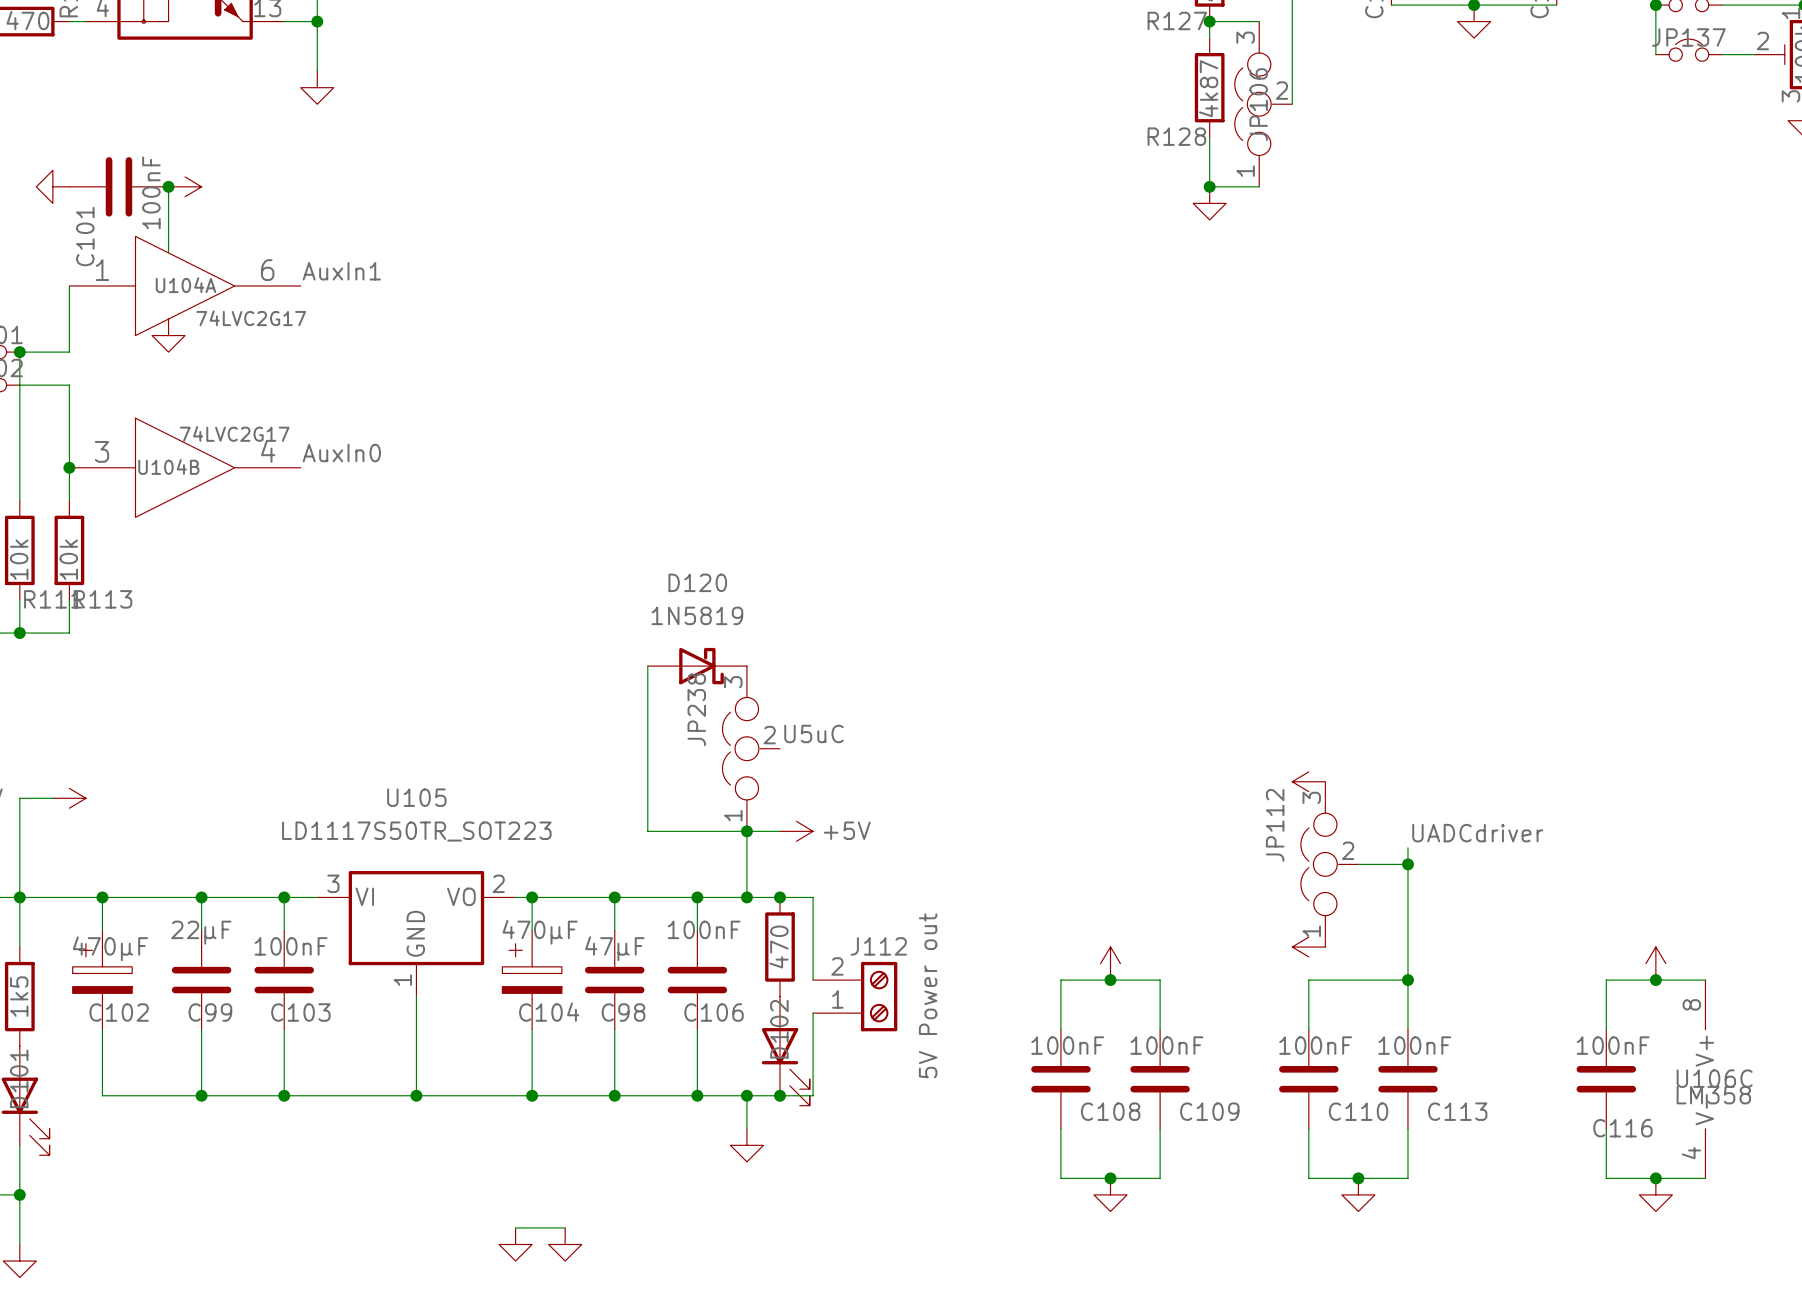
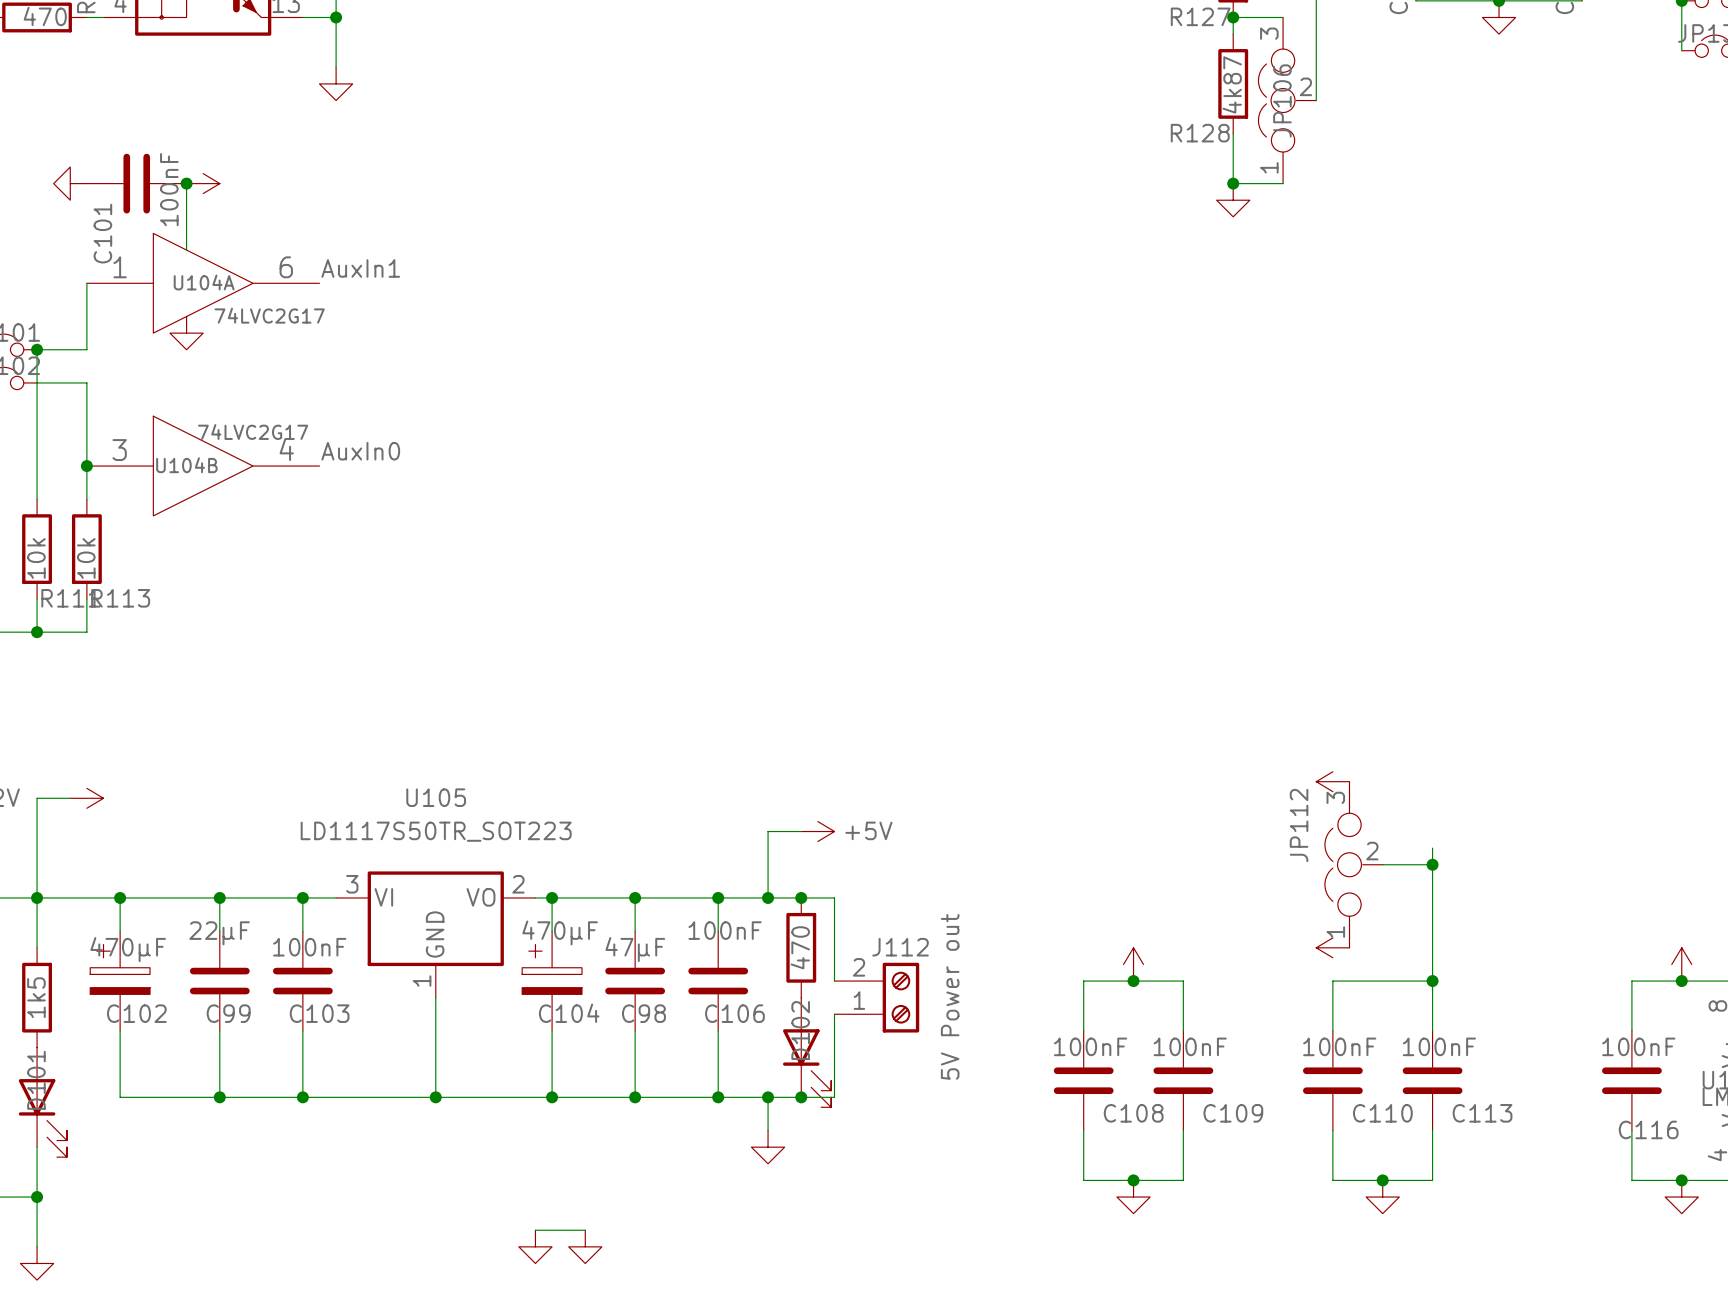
wire: (647, 666) (647, 831) (746, 831) -> none
D120: 1N5819 (697, 666) -> none
label: U5uC (813, 733) -> none
JP238: (751, 748) -> none
junction: (746, 831) -> none
label: UADCdriver (1477, 833) -> none

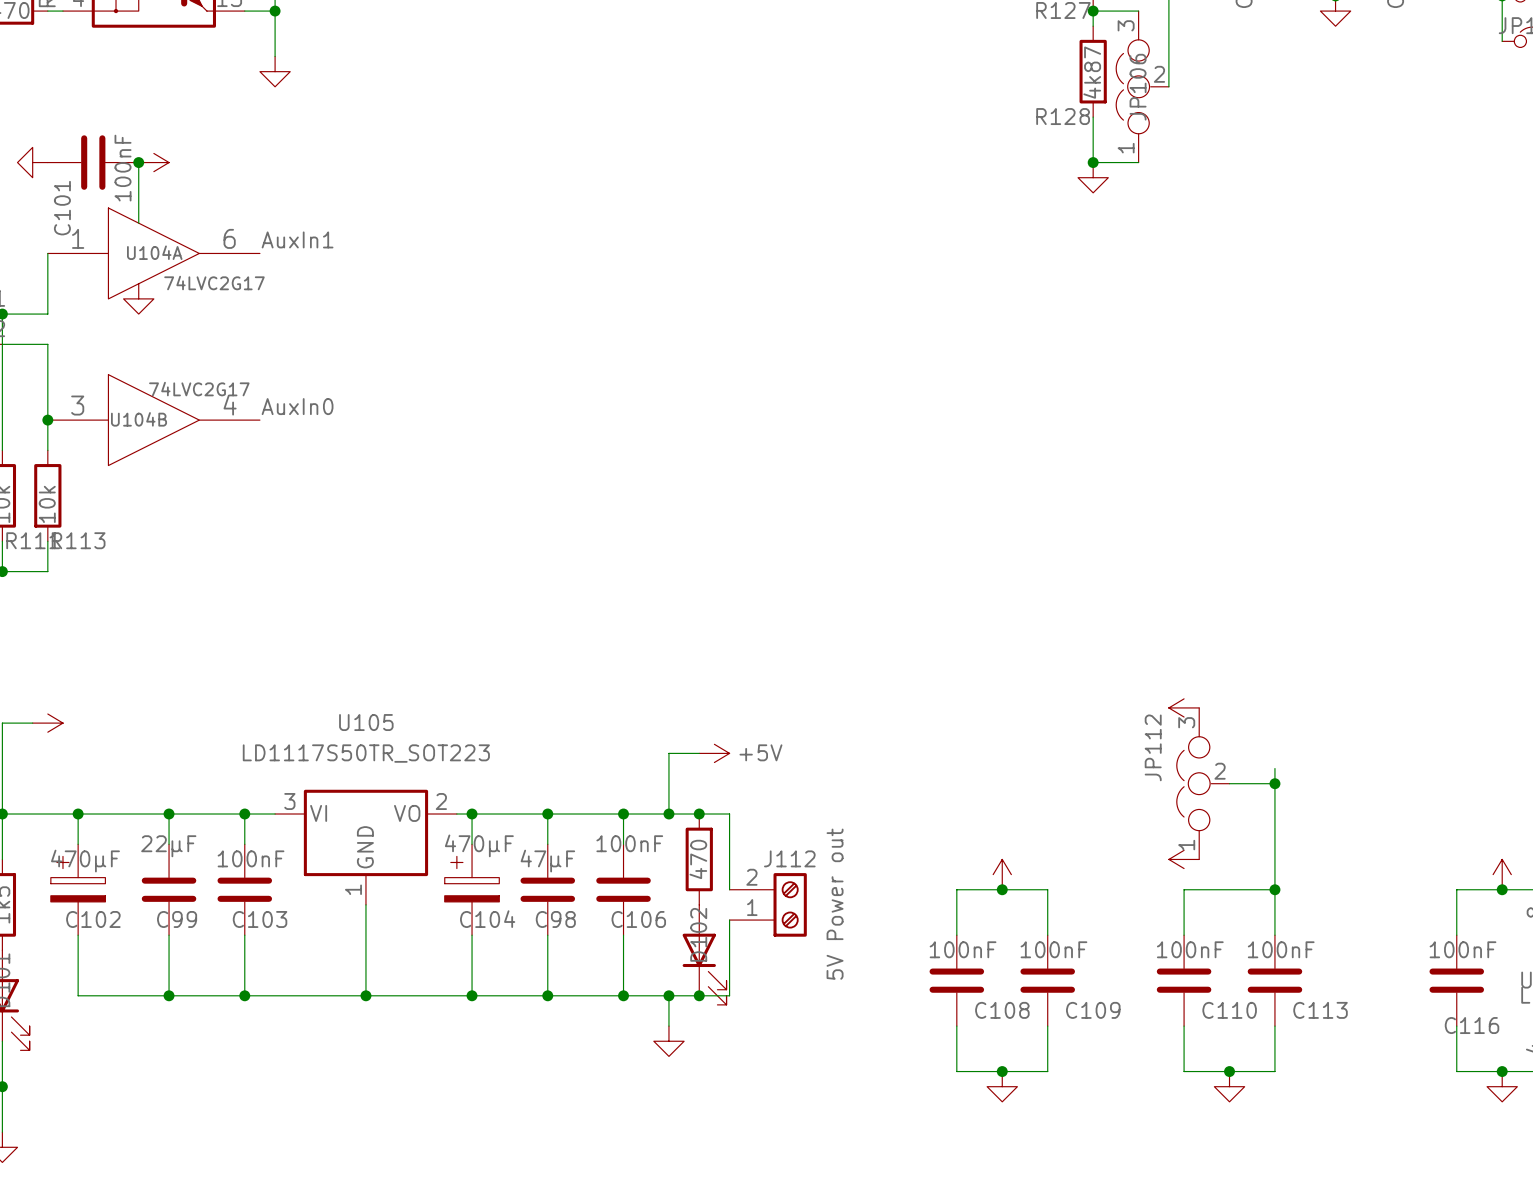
wire: (535, 1230) (585, 1230) -> none
power symbol: (535, 1246) -> none
power symbol: (585, 1246) -> none

